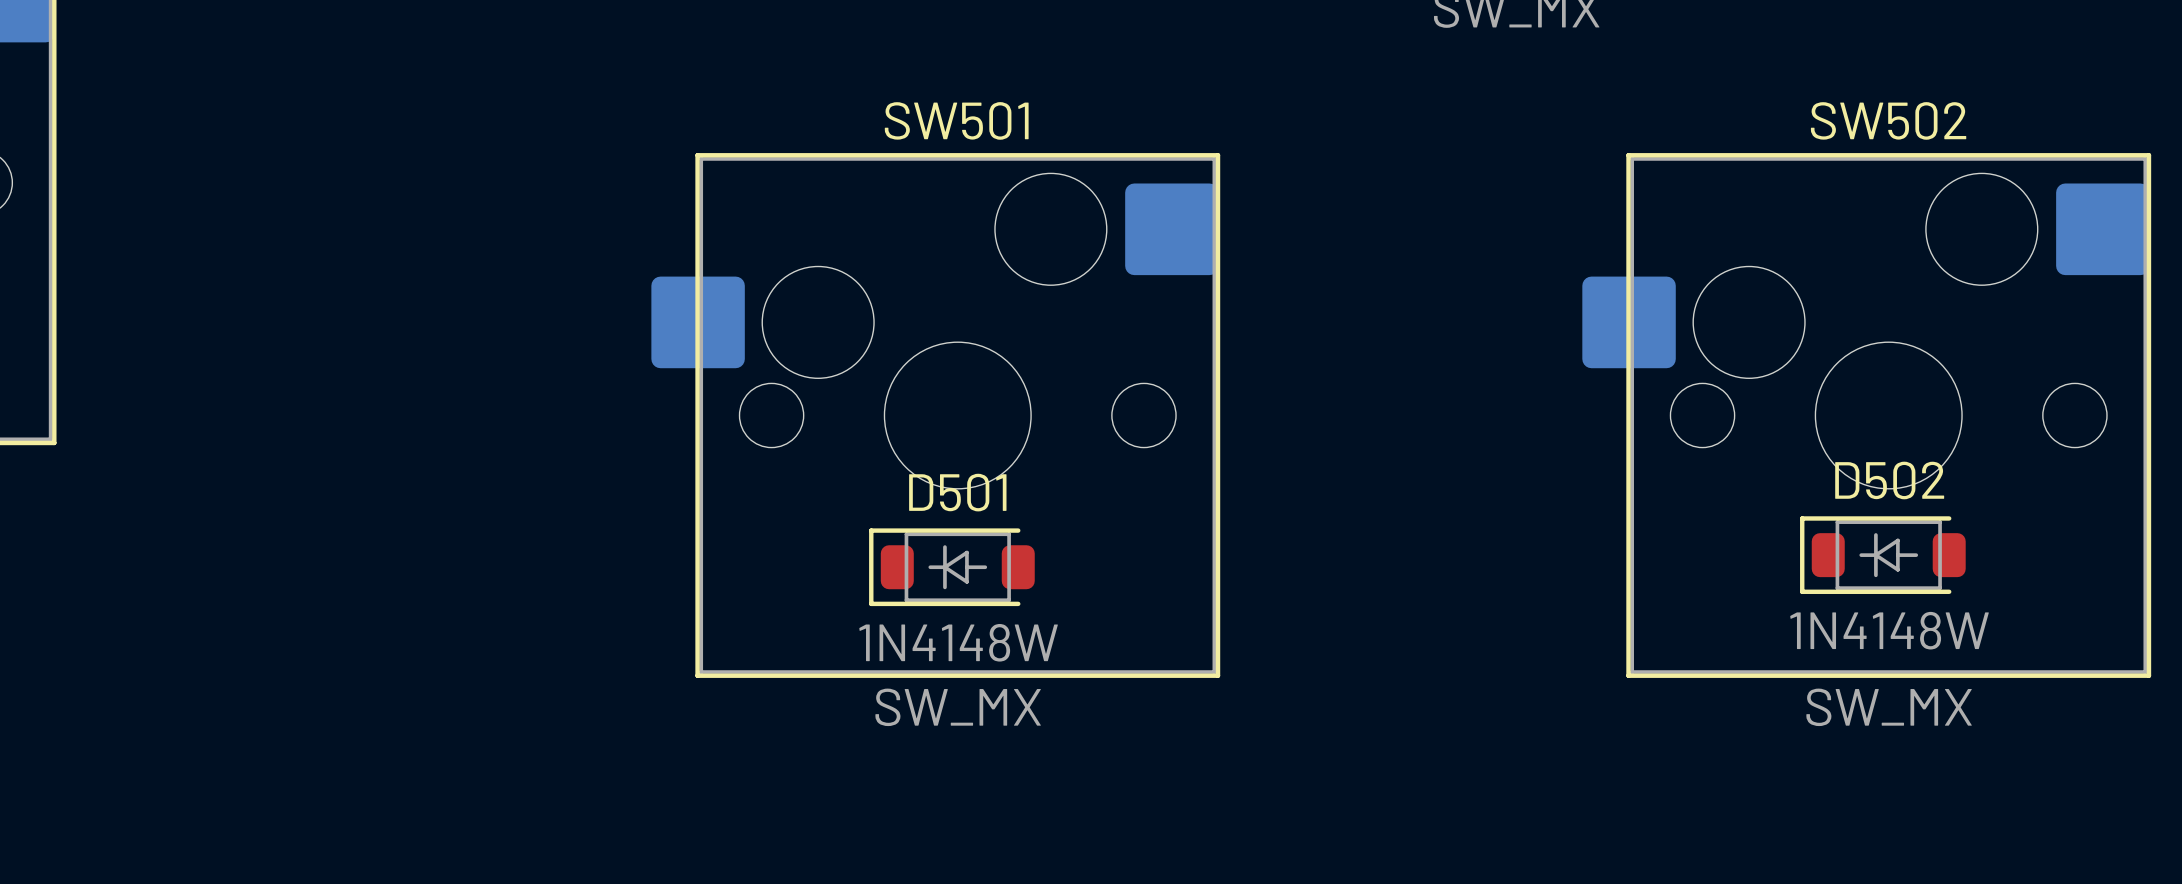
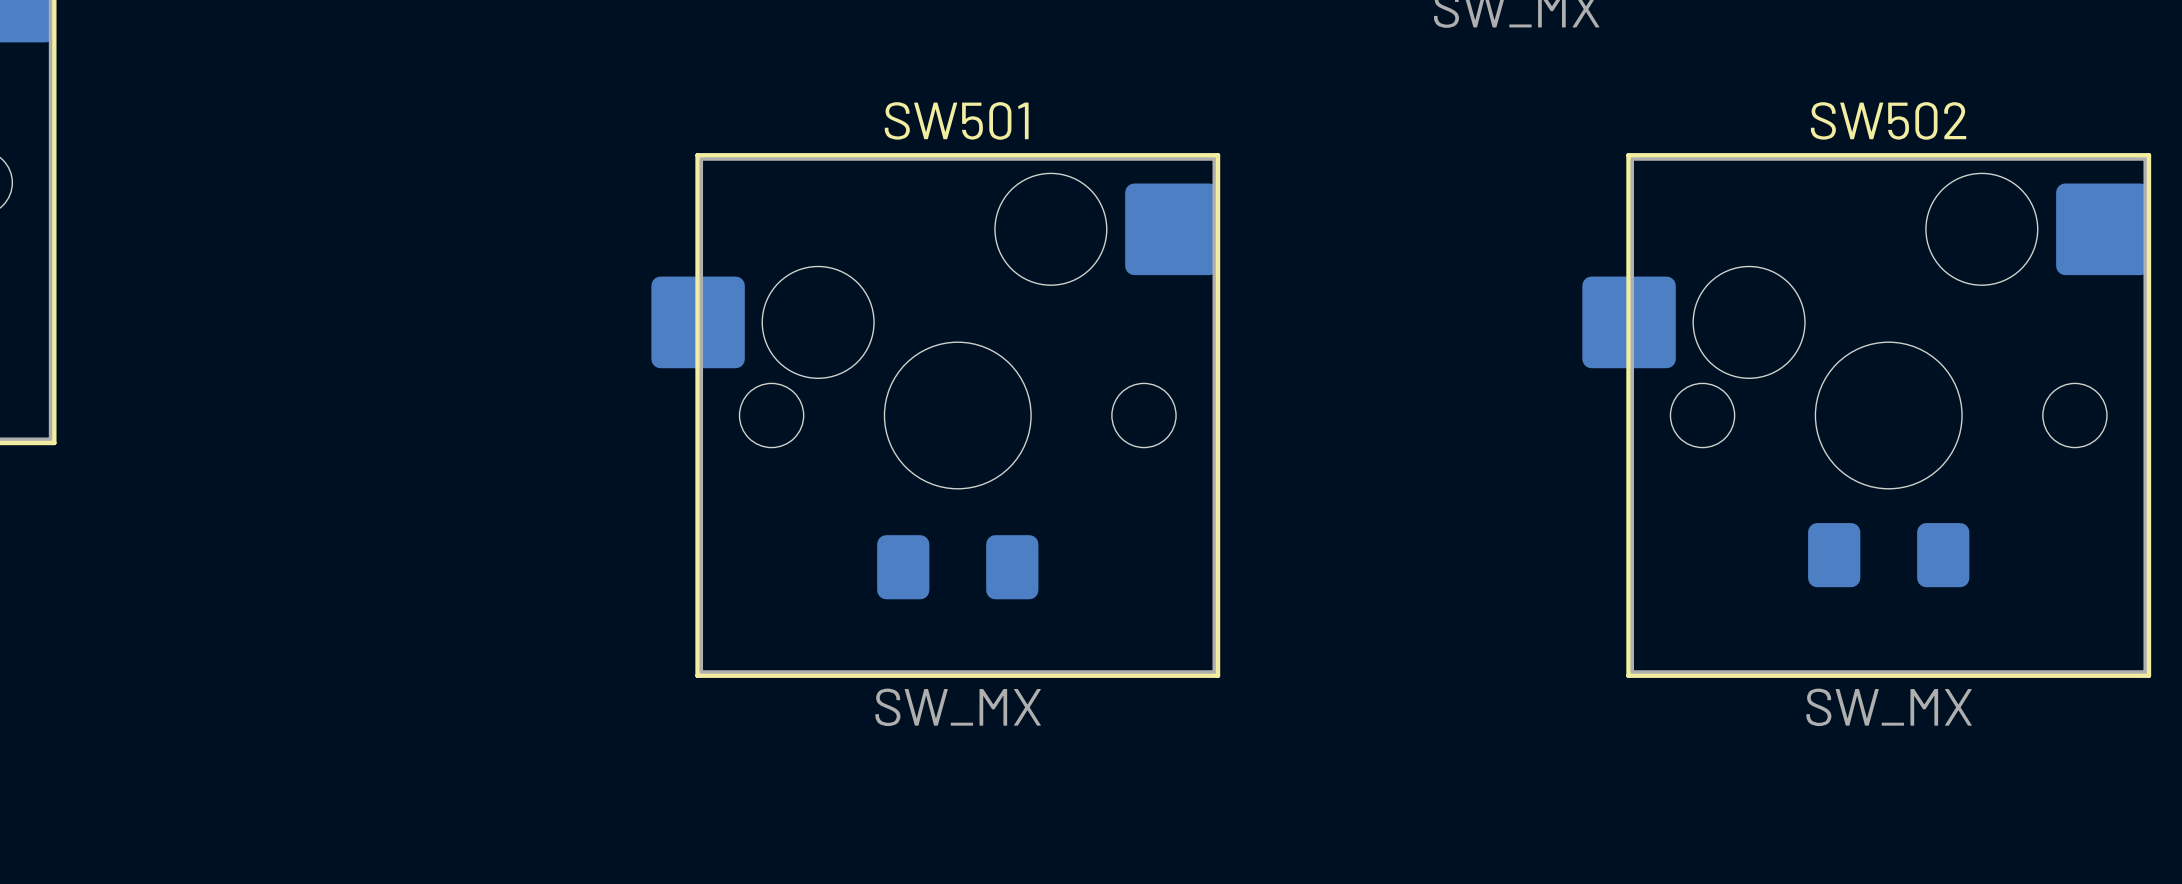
D502: 1N4148W (1882, 555) -> none
part: none -> (1888, 555)
D501: 1N4148W (951, 567) -> none
part: none -> (957, 567)

